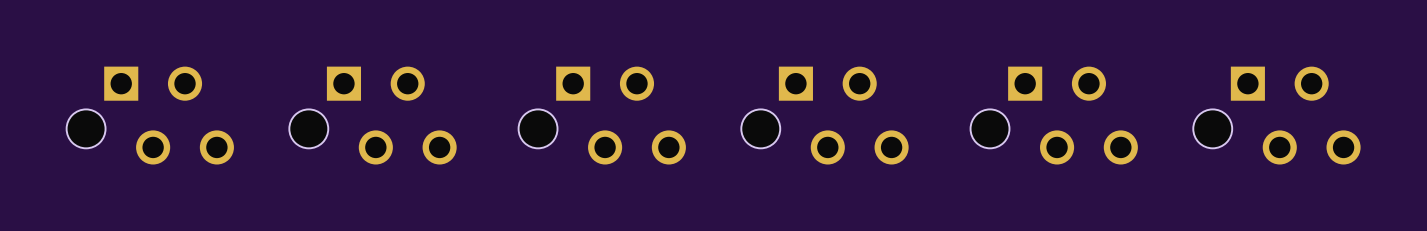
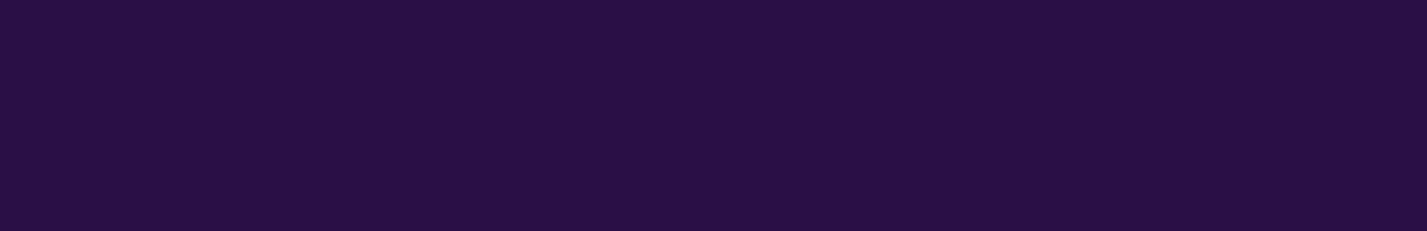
part: (150, 115) -> none
part: (373, 115) -> none
part: (602, 115) -> none
part: (824, 115) -> none
part: (1054, 115) -> none
part: (1276, 115) -> none

